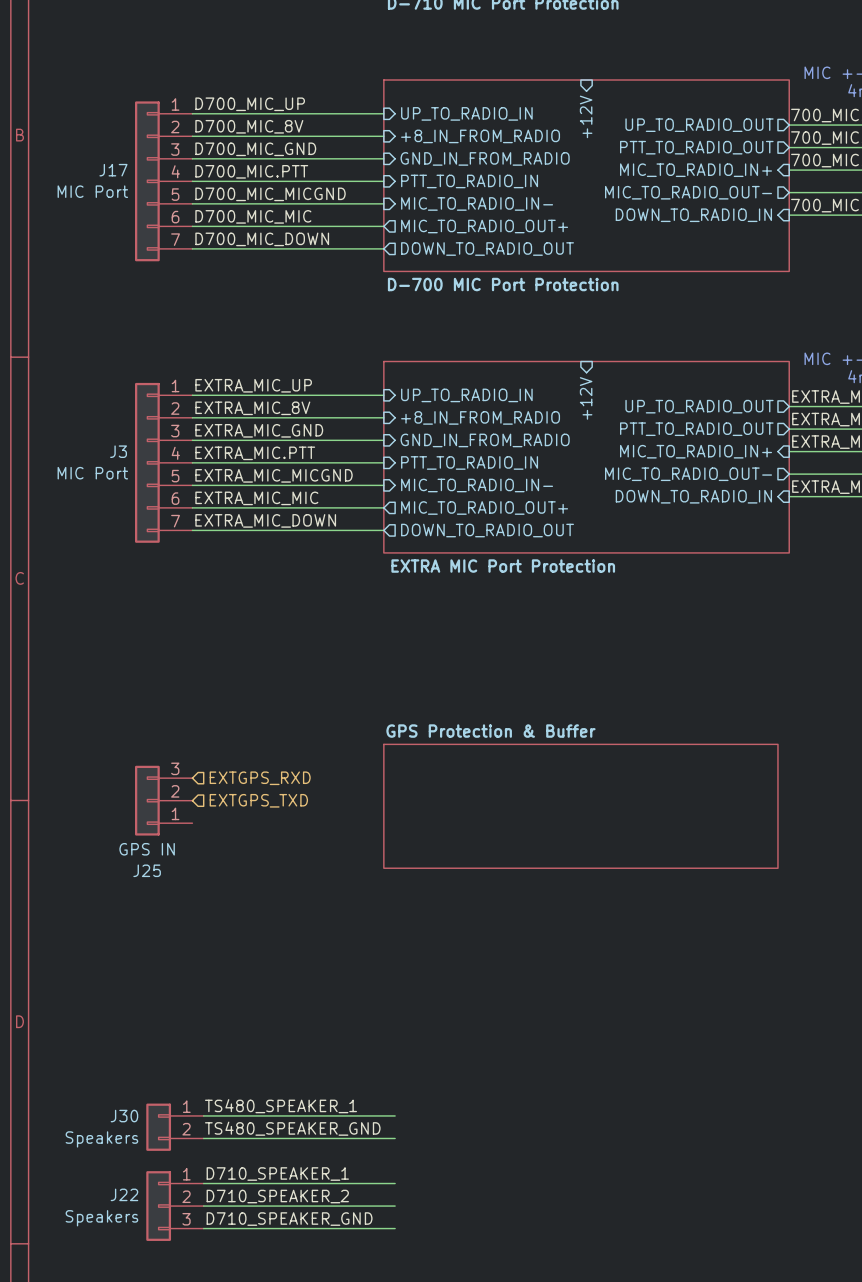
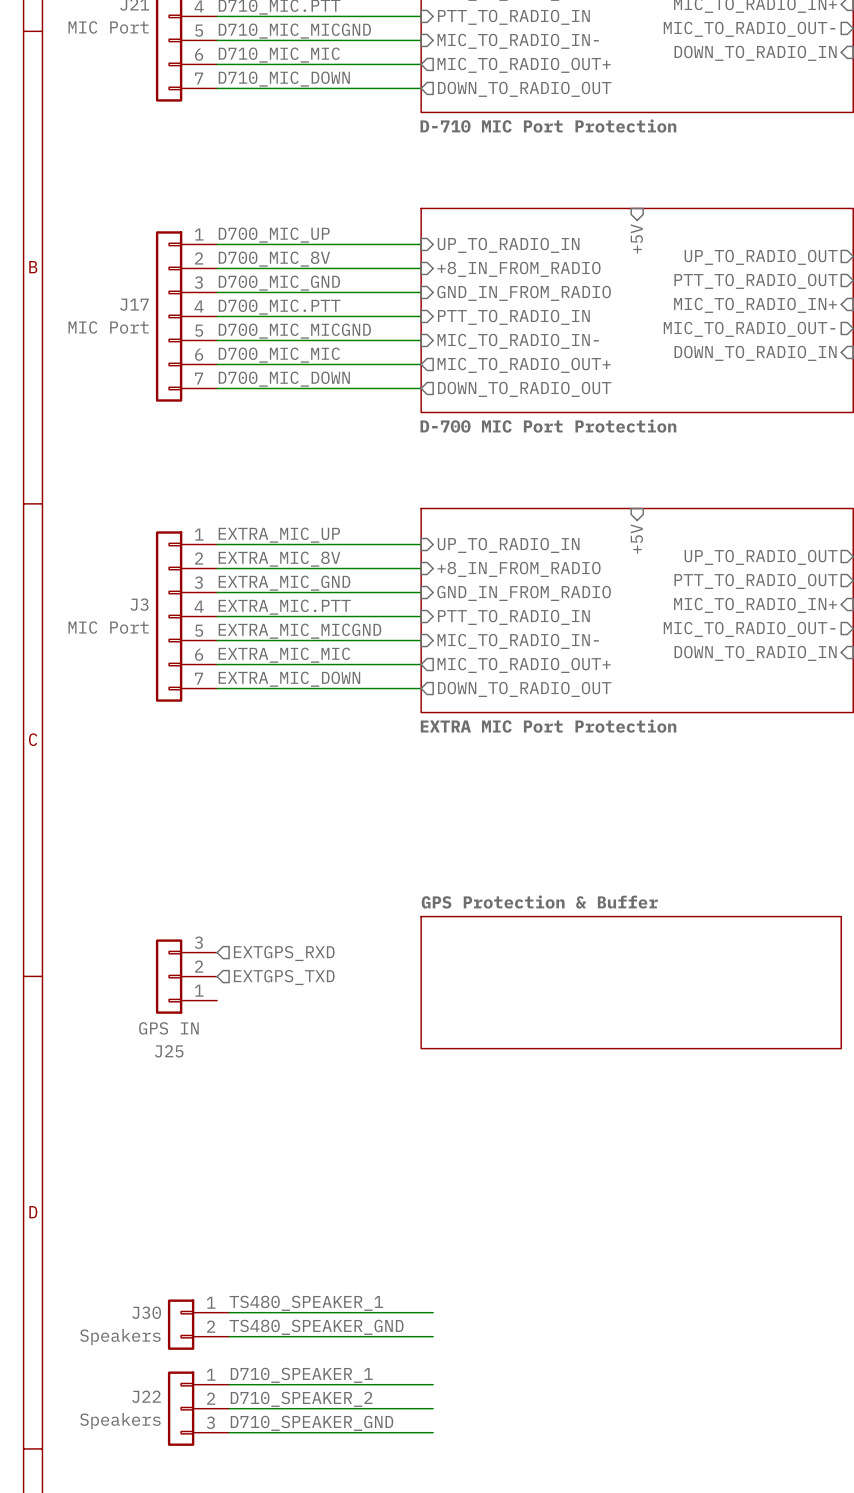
sheet pin: +12V (586, 116) -> +5V (636, 238)
sheet pin: +12V (586, 398) -> +5V (636, 539)

